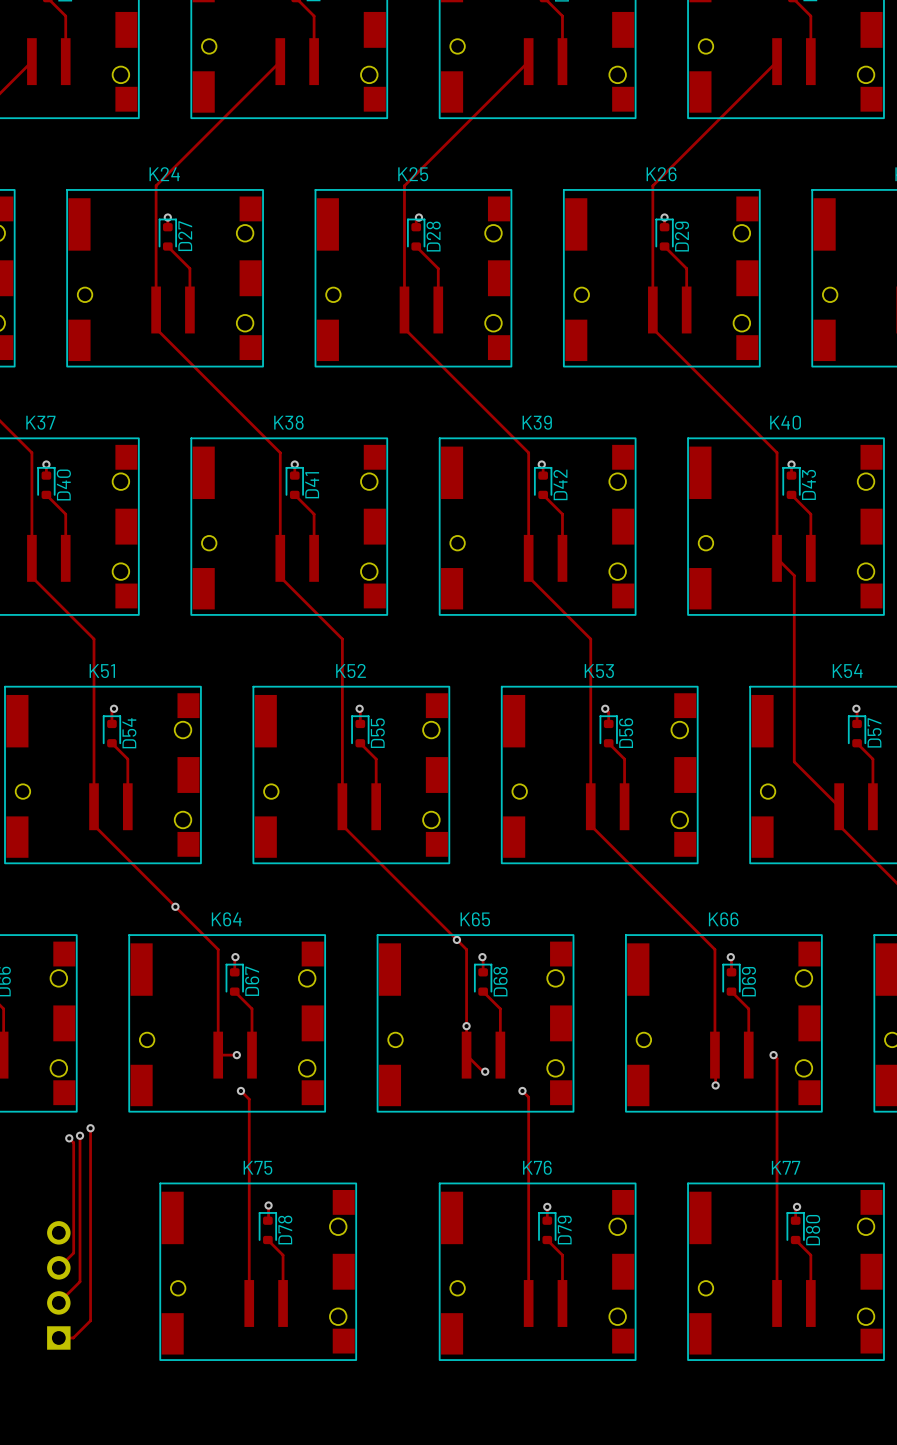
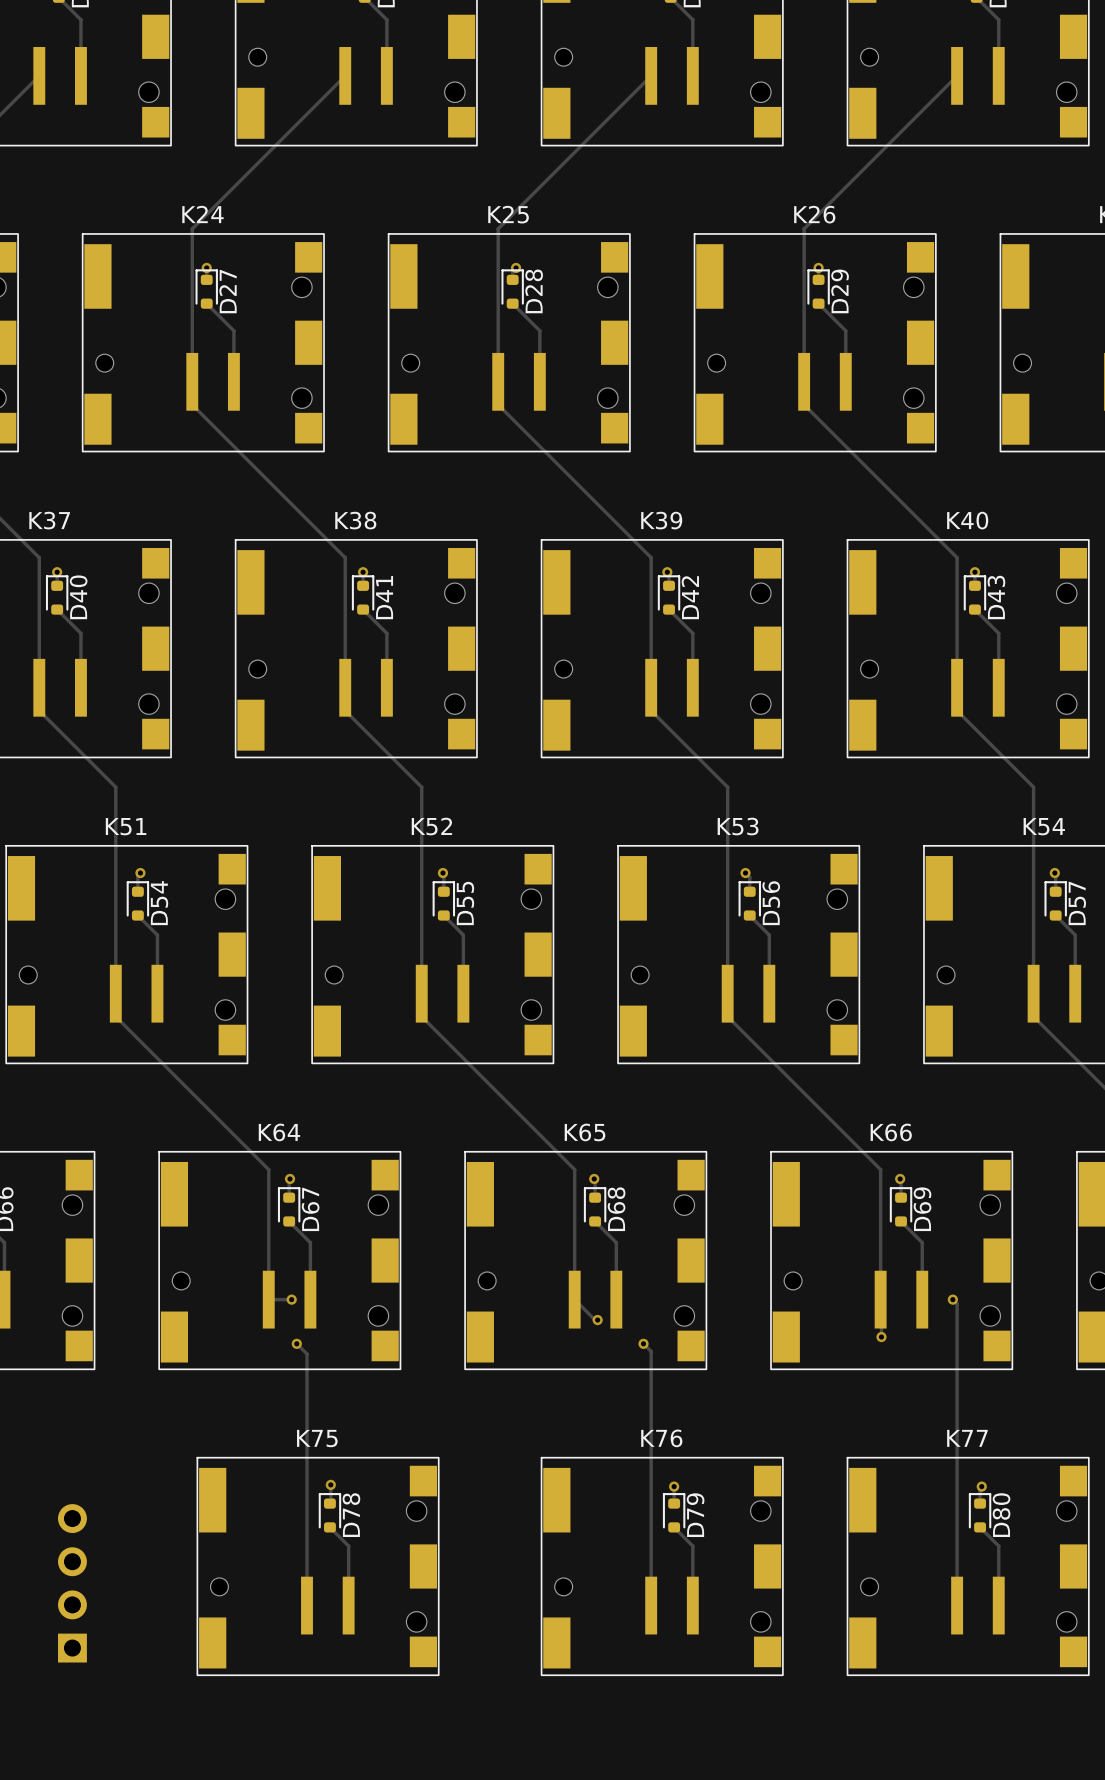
track: (777, 558) (794, 575) (794, 761) (839, 806) -> (957, 687) (957, 710) (1033, 787) (1033, 993)
via: (175, 906) -> none
via: (456, 939) -> none
via: (466, 1026) -> none
track: (90, 1128) (90, 1320) (73, 1337) (58, 1337) -> none
via: (90, 1128) -> none
track: (80, 1135) (80, 1281) (58, 1302) -> none
via: (80, 1135) -> none
track: (69, 1138) (73, 1142) (73, 1253) (58, 1267) -> none
via: (69, 1138) -> none

